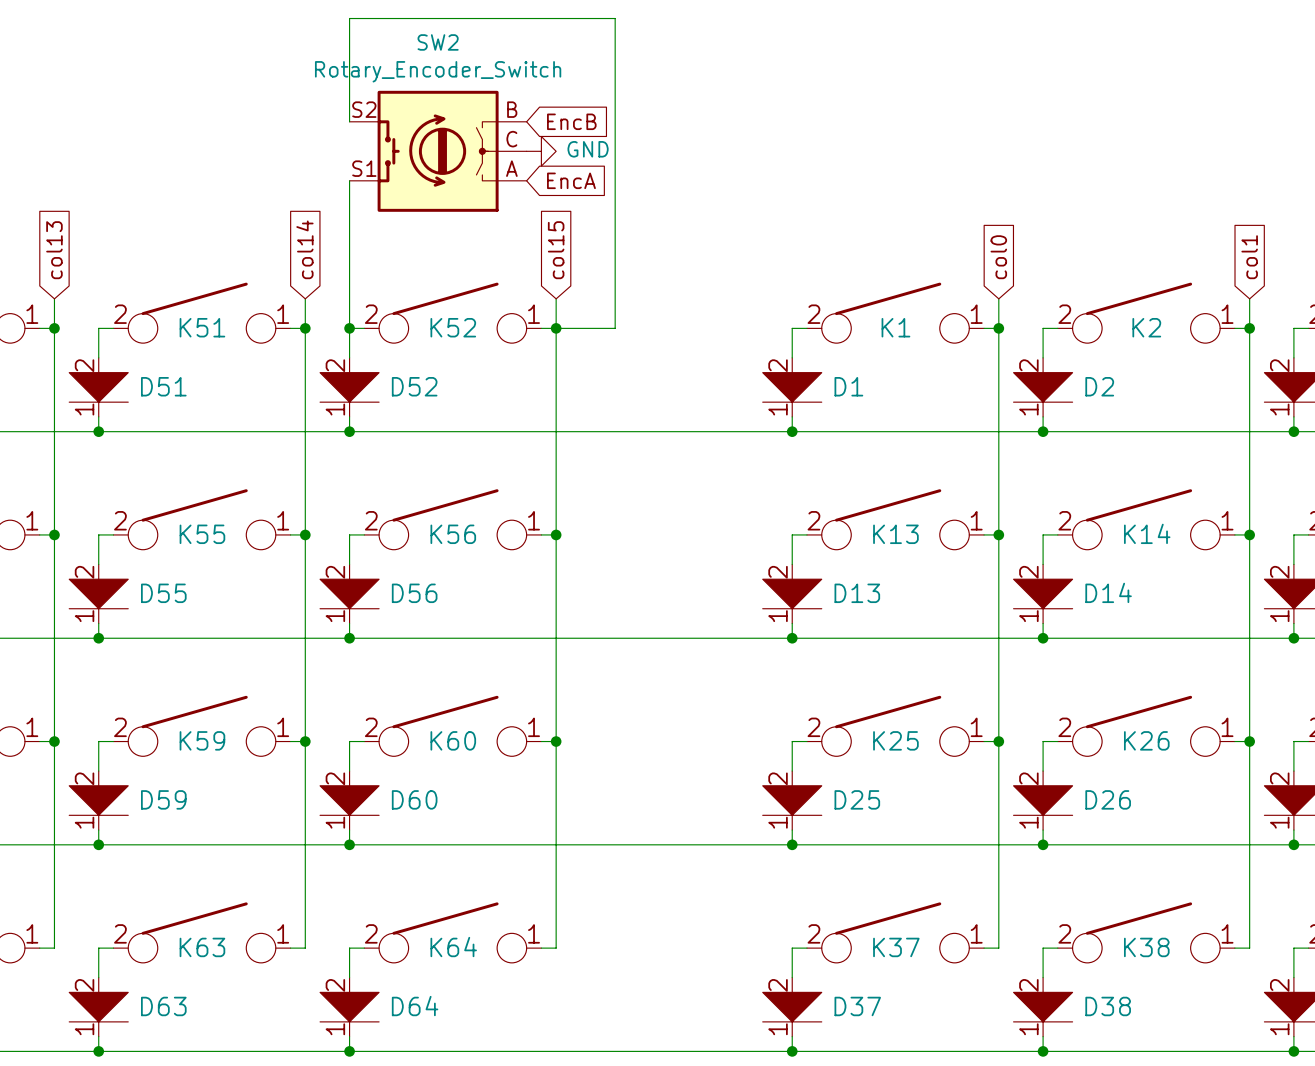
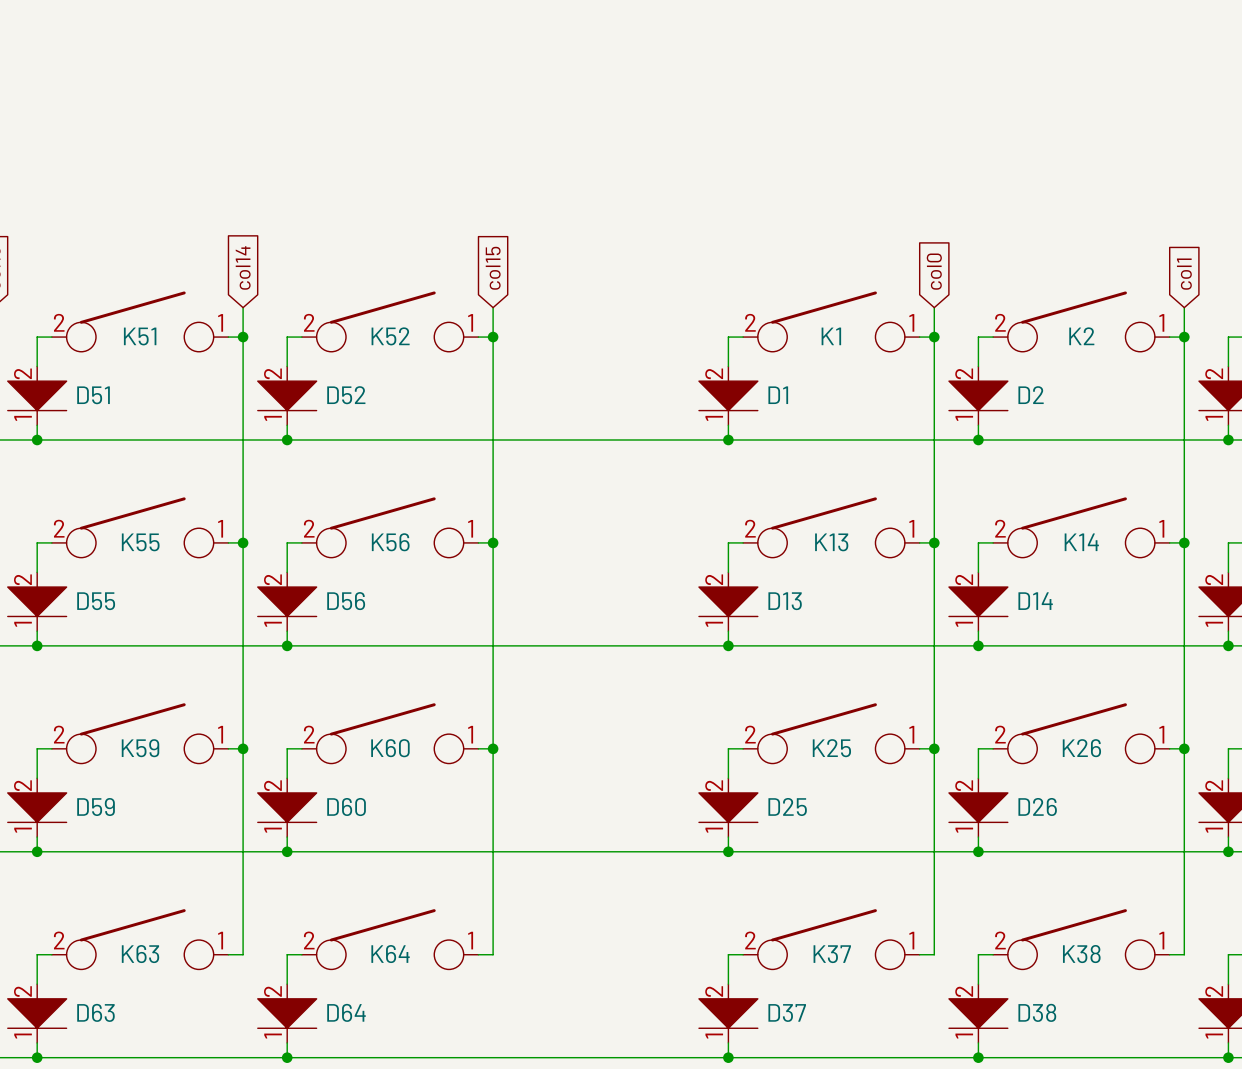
wire: (349, 121) (349, 18) (615, 18) (615, 328) (556, 328) -> none
global label: EncB (571, 121) -> none
SW2: Rotary_Encoder_Switch (438, 151) -> none
power symbol: GND (541, 151) -> none
wire: (349, 180) (349, 328) -> none
global label: EncA (571, 180) -> none
junction: (349, 328) -> none

